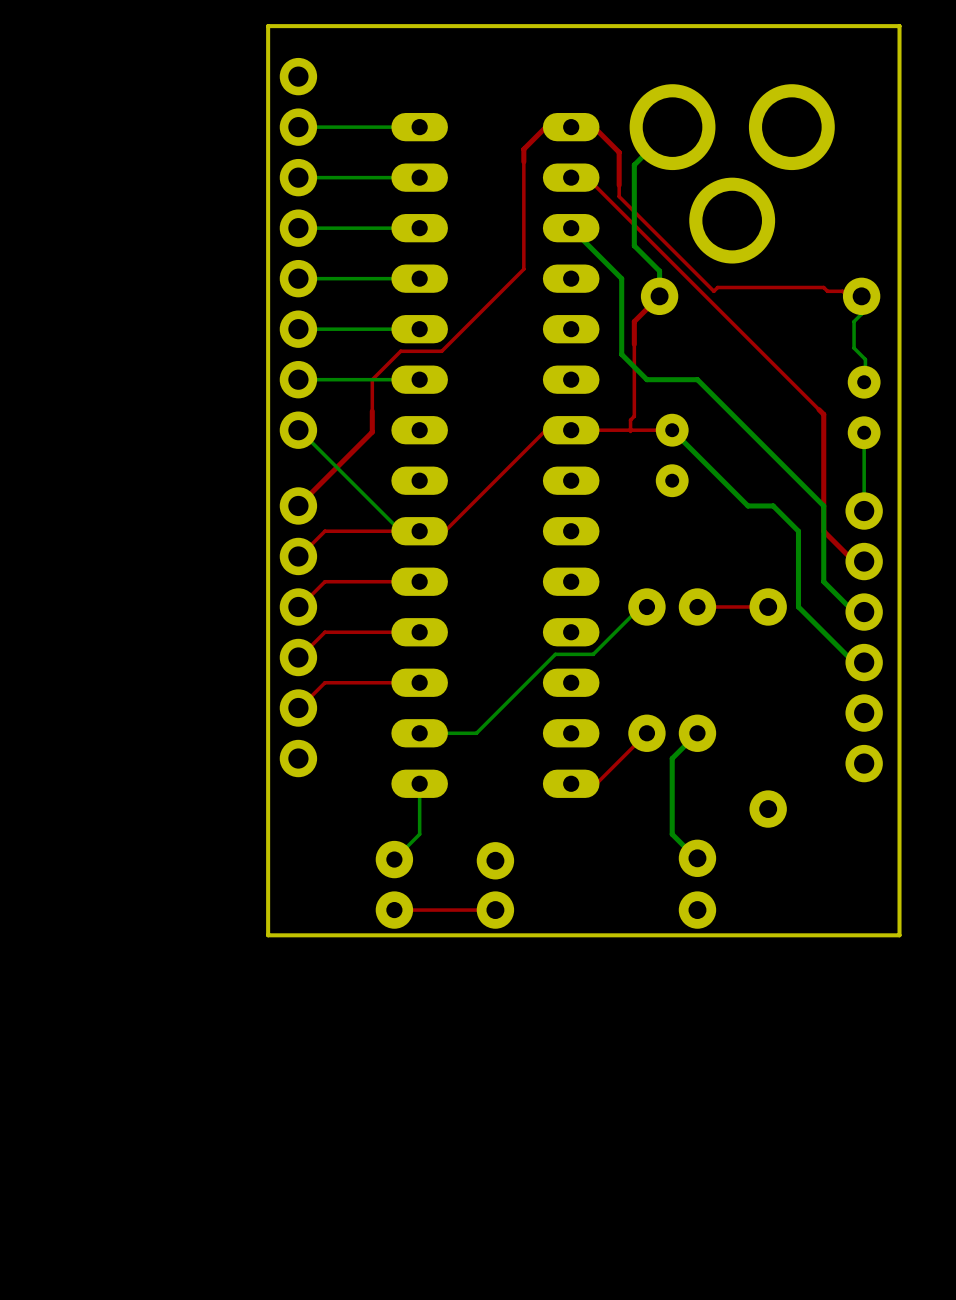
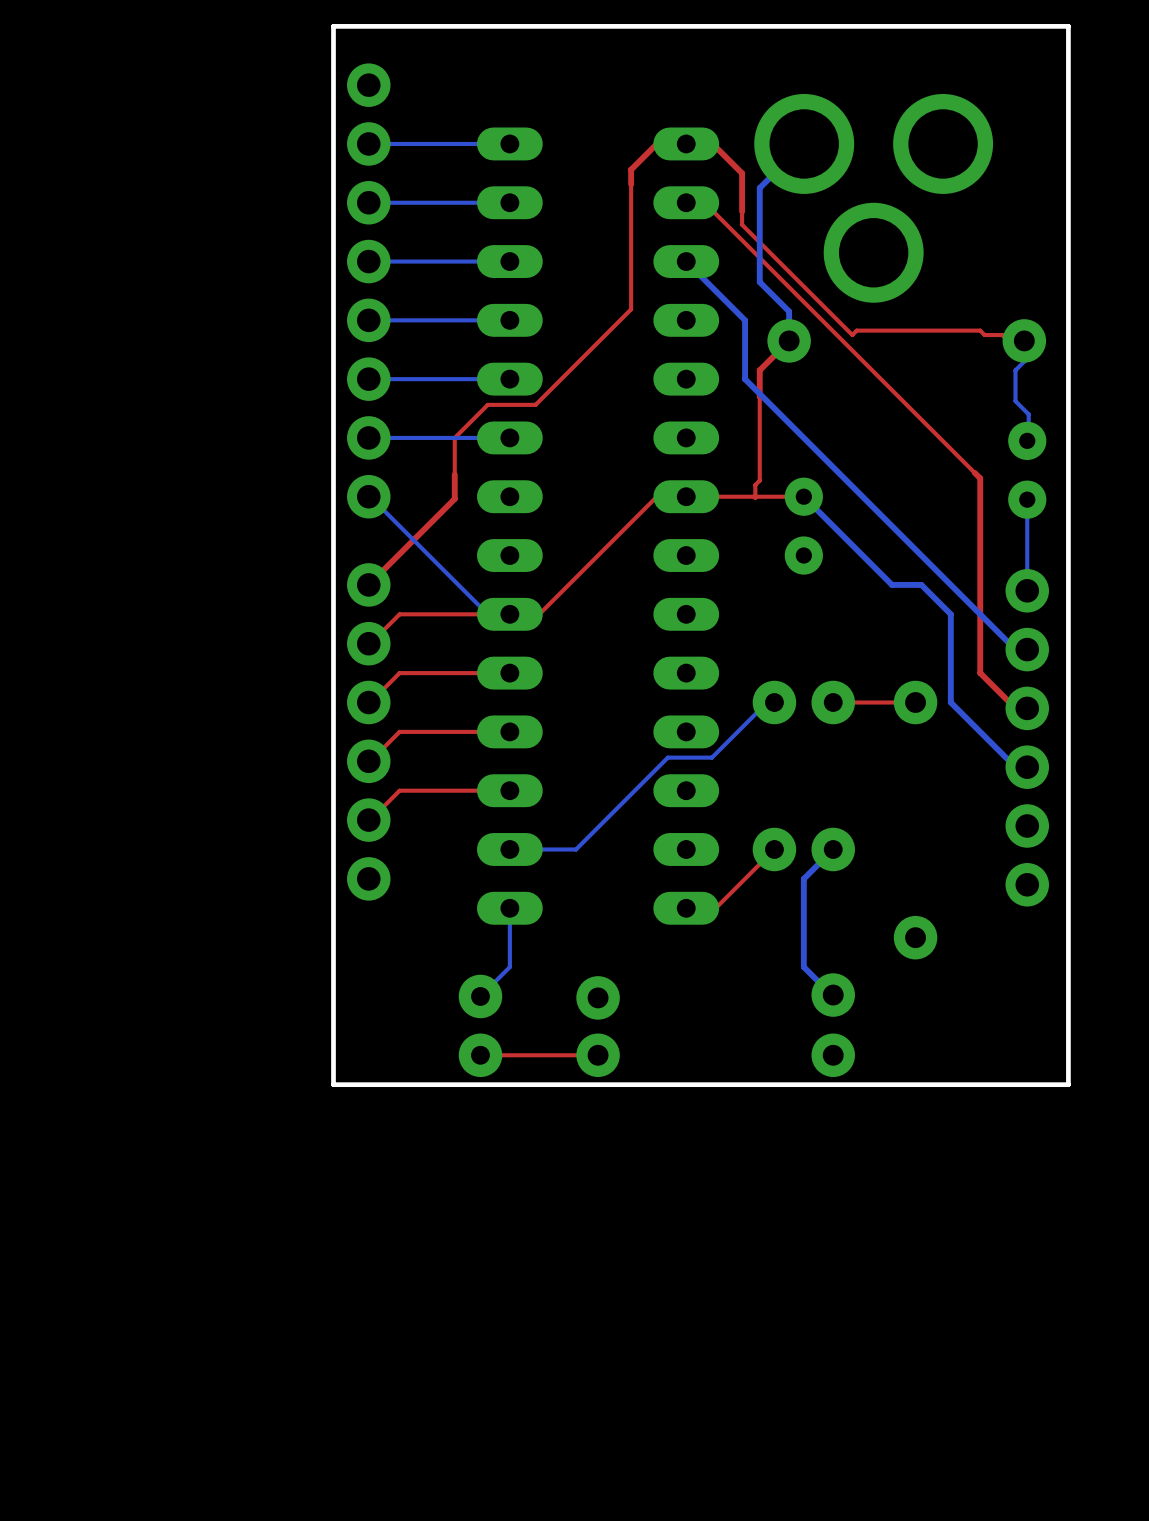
bottom track: (621, 329) (621, 354) (646, 379) (697, 379) (823, 505) (823, 581) (854, 612) (864, 612) -> (745, 379) (1015, 649) (1027, 649)
top track: (823, 531) (854, 561) (864, 561) -> (980, 614) (980, 673) (1015, 708) (1027, 708)

